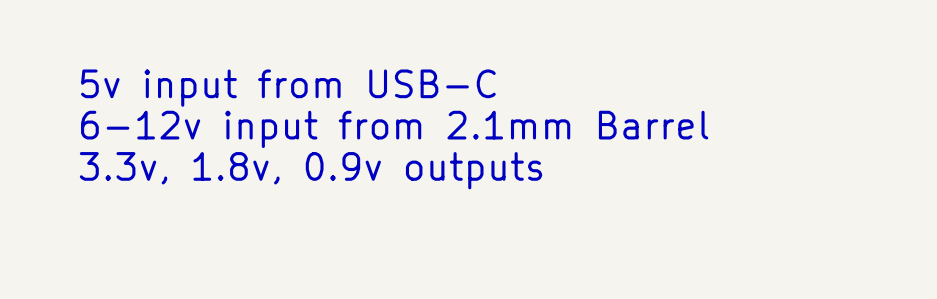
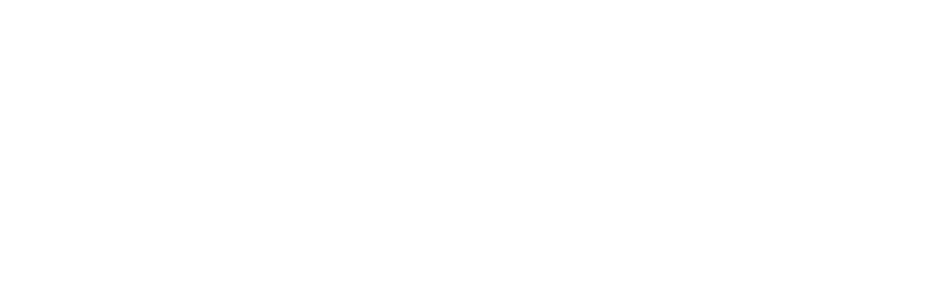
text: 5v input from USB-C (288, 88) -> none
text: 6-12v input from 2.1mm Barrel (394, 129) -> none
text: 3.3v, 1.8v, 0.9v outputs (310, 170) -> none

